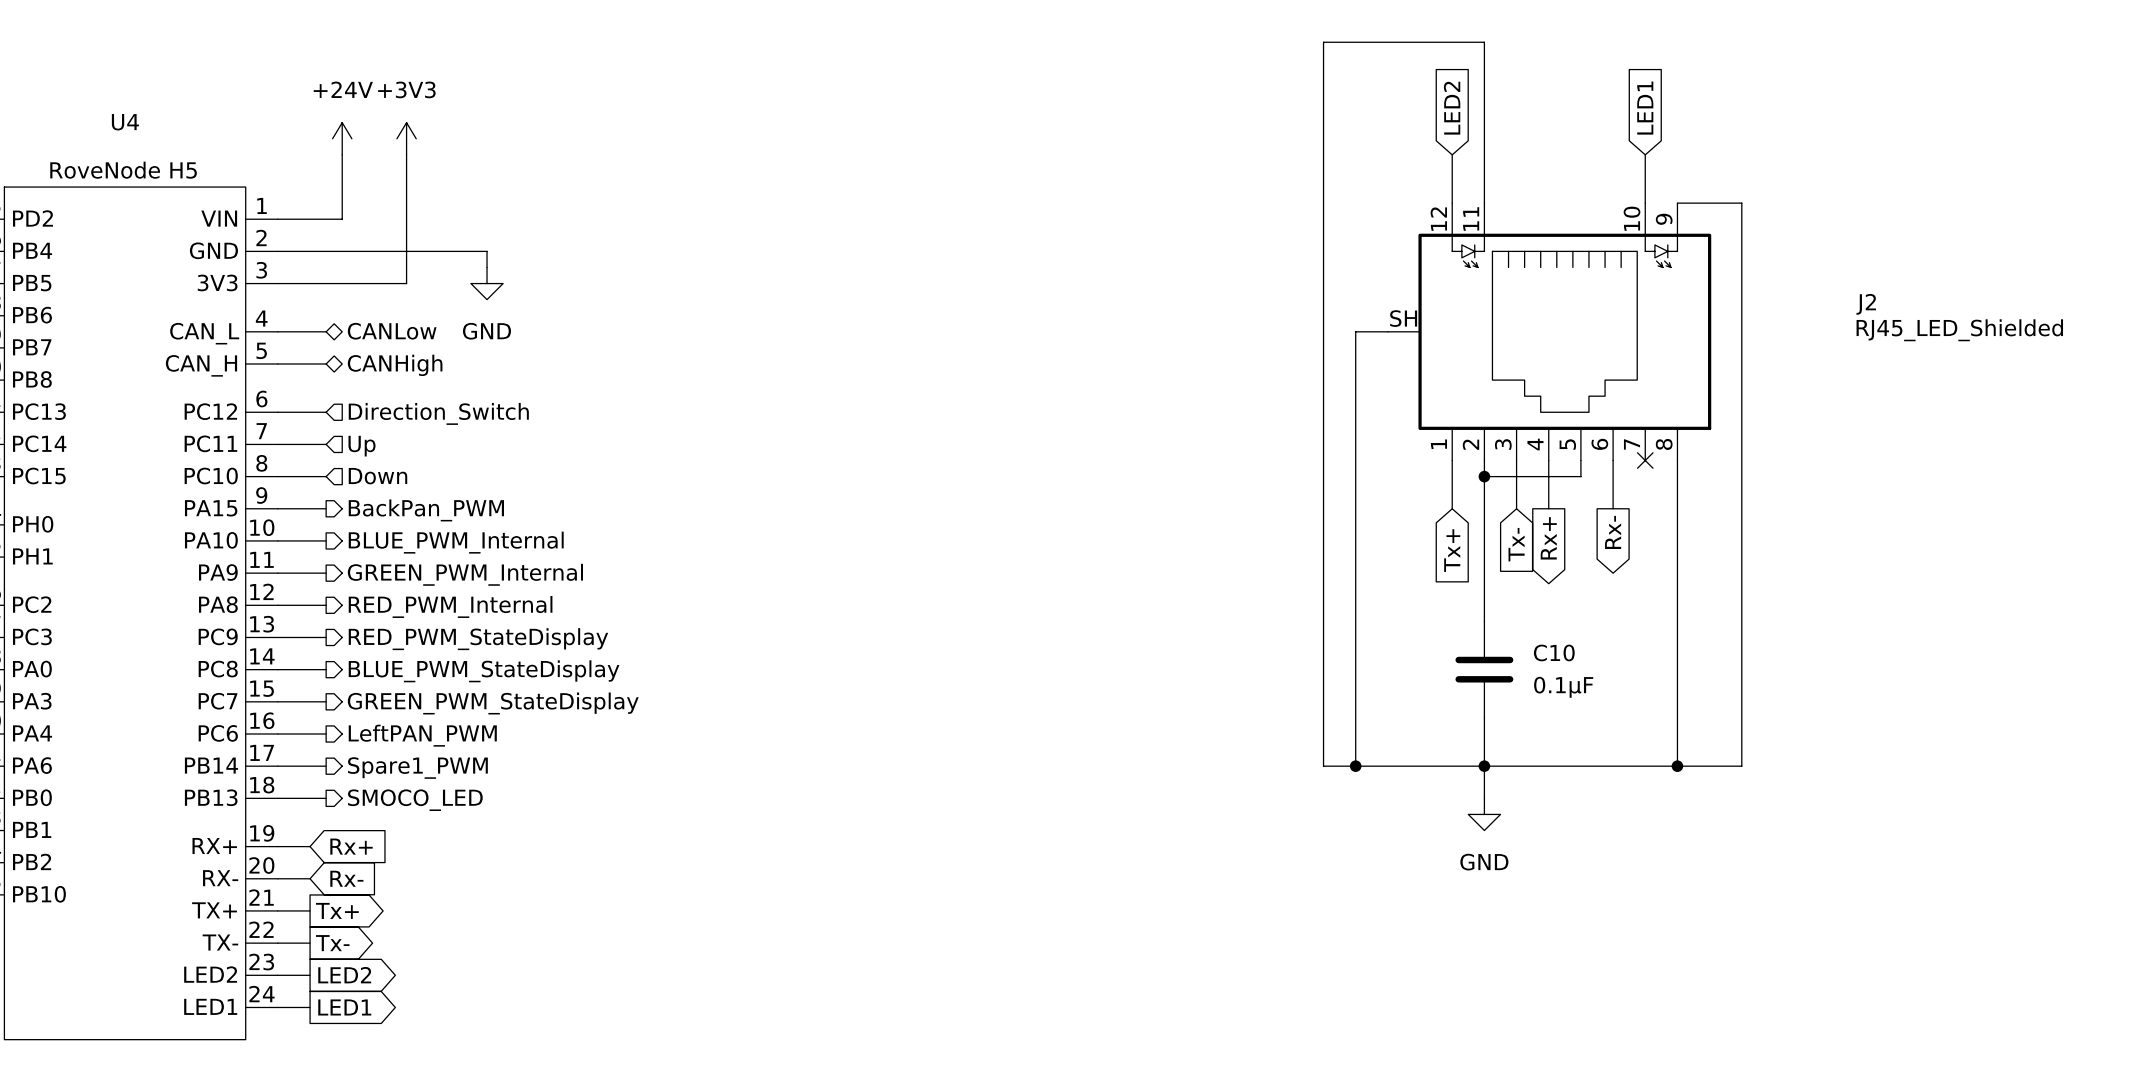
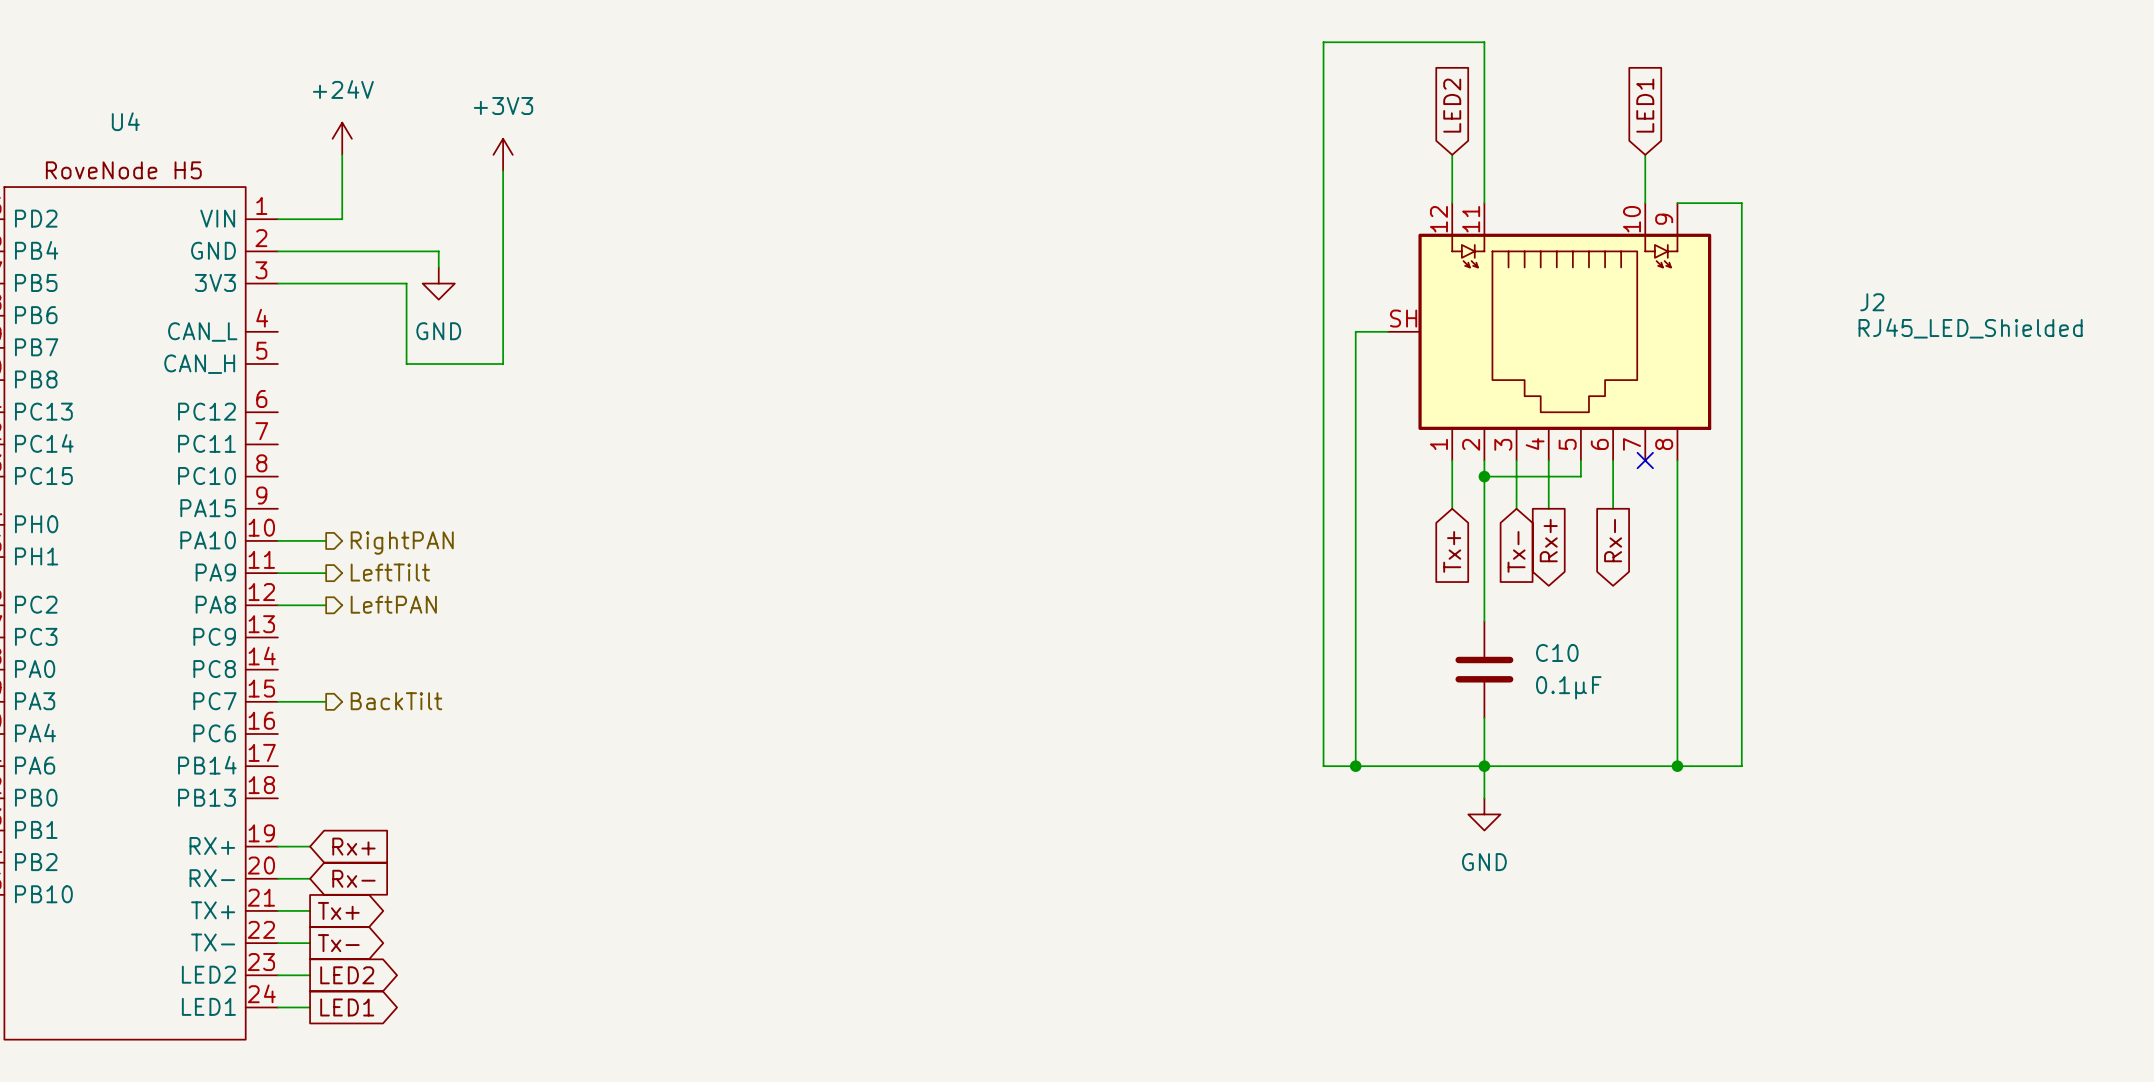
power symbol position: +3V3 (406, 138) -> +3V3 (503, 154)
wire: (406, 154) (406, 283) -> (503, 170) (503, 364) (406, 364) (406, 283)
wire: (438, 251) (487, 251) (487, 267) -> (438, 251) (438, 267)
power symbol position: GND (487, 283) -> GND (438, 283)
wire: (277, 331) (326, 331) -> none
hierarchical label: CANLow (392, 331) -> none
wire: (277, 364) (326, 364) -> none
hierarchical label: CANHigh (395, 365) -> none
wire: (277, 412) (326, 412) -> none
hierarchical label: Direction_Switch (438, 413) -> none
wire: (277, 444) (326, 444) -> none
hierarchical label: Up (362, 446) -> none
wire: (277, 476) (326, 476) -> none
hierarchical label: Down (377, 476) -> none
wire: (277, 508) (326, 508) -> none
hierarchical label: BackPan_PWM (426, 510) -> none
hierarchical label: BLUE_PWM_Internal (456, 542) -> RightPAN (402, 543)
hierarchical label: GREEN_PWM_Internal (465, 574) -> LeftTilt (390, 572)
hierarchical label: RED_PWM_Internal (450, 606) -> LeftPAN (393, 604)
wire: (277, 637) (326, 637) -> none
hierarchical label: RED_PWM_StateDisplay (478, 639) -> none
wire: (277, 669) (326, 669) -> none
hierarchical label: BLUE_PWM_StateDisplay (484, 671) -> none
hierarchical label: GREEN_PWM_StateDisplay (493, 703) -> BackTilt (396, 701)
wire: (277, 734) (326, 734) -> none
hierarchical label: LeftPAN_PWM (422, 735) -> none
wire: (277, 766) (326, 766) -> none
hierarchical label: Spare1_PWM (417, 768) -> none
wire: (277, 798) (326, 798) -> none
hierarchical label: SMOCO_LED (415, 800) -> none

